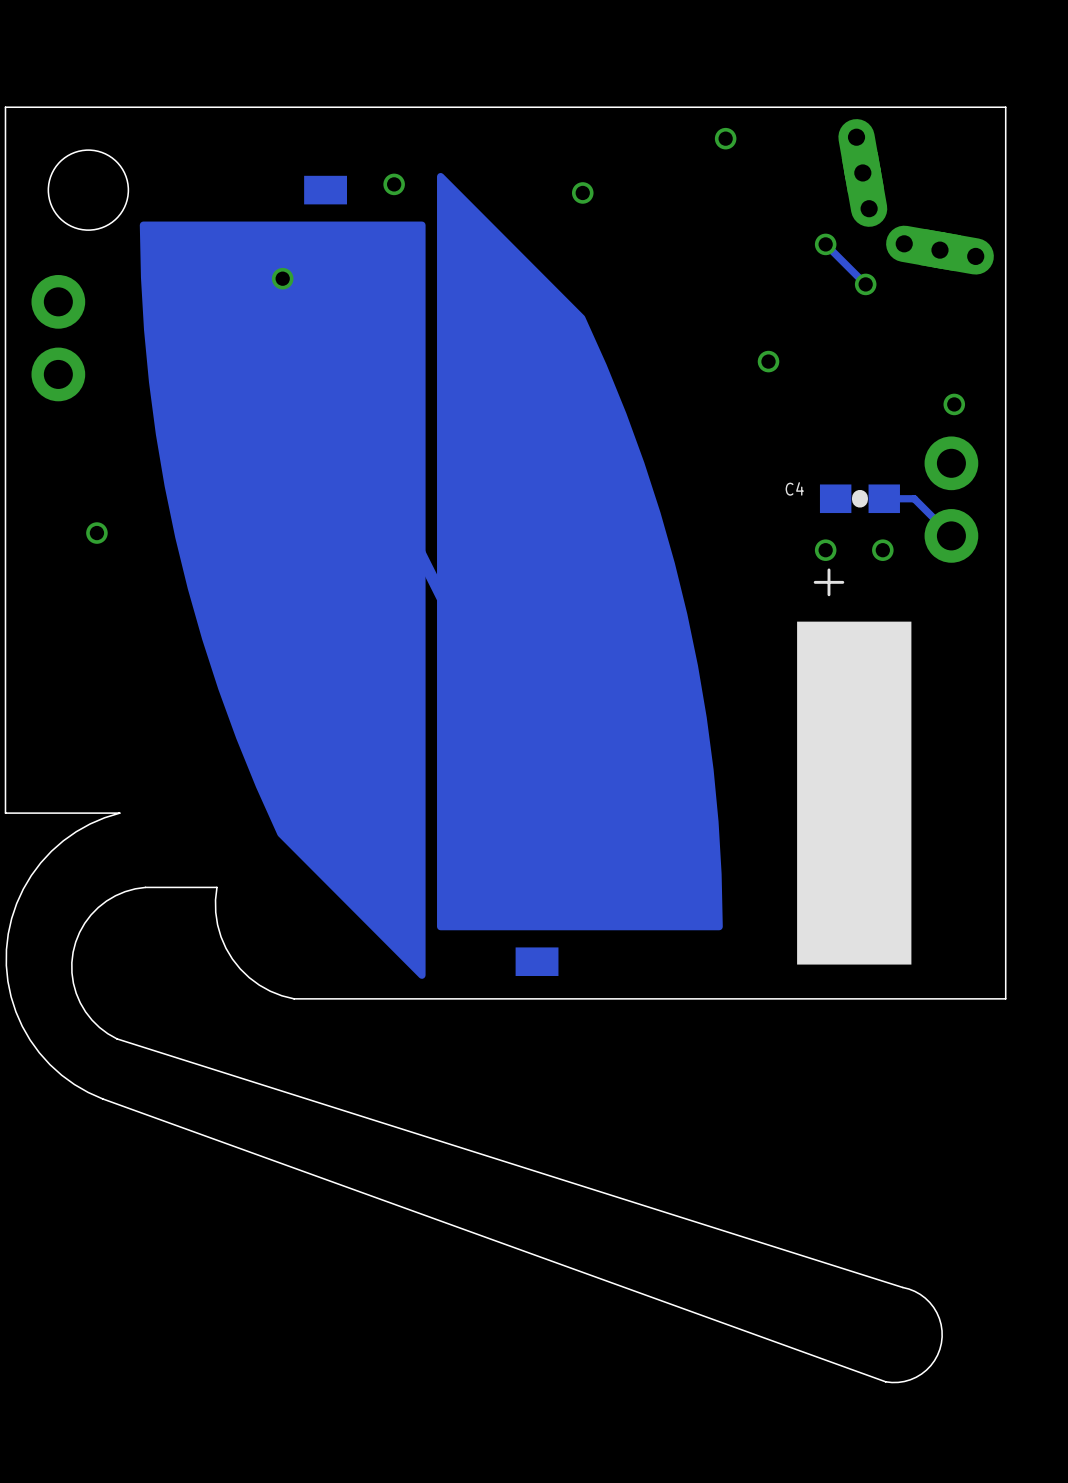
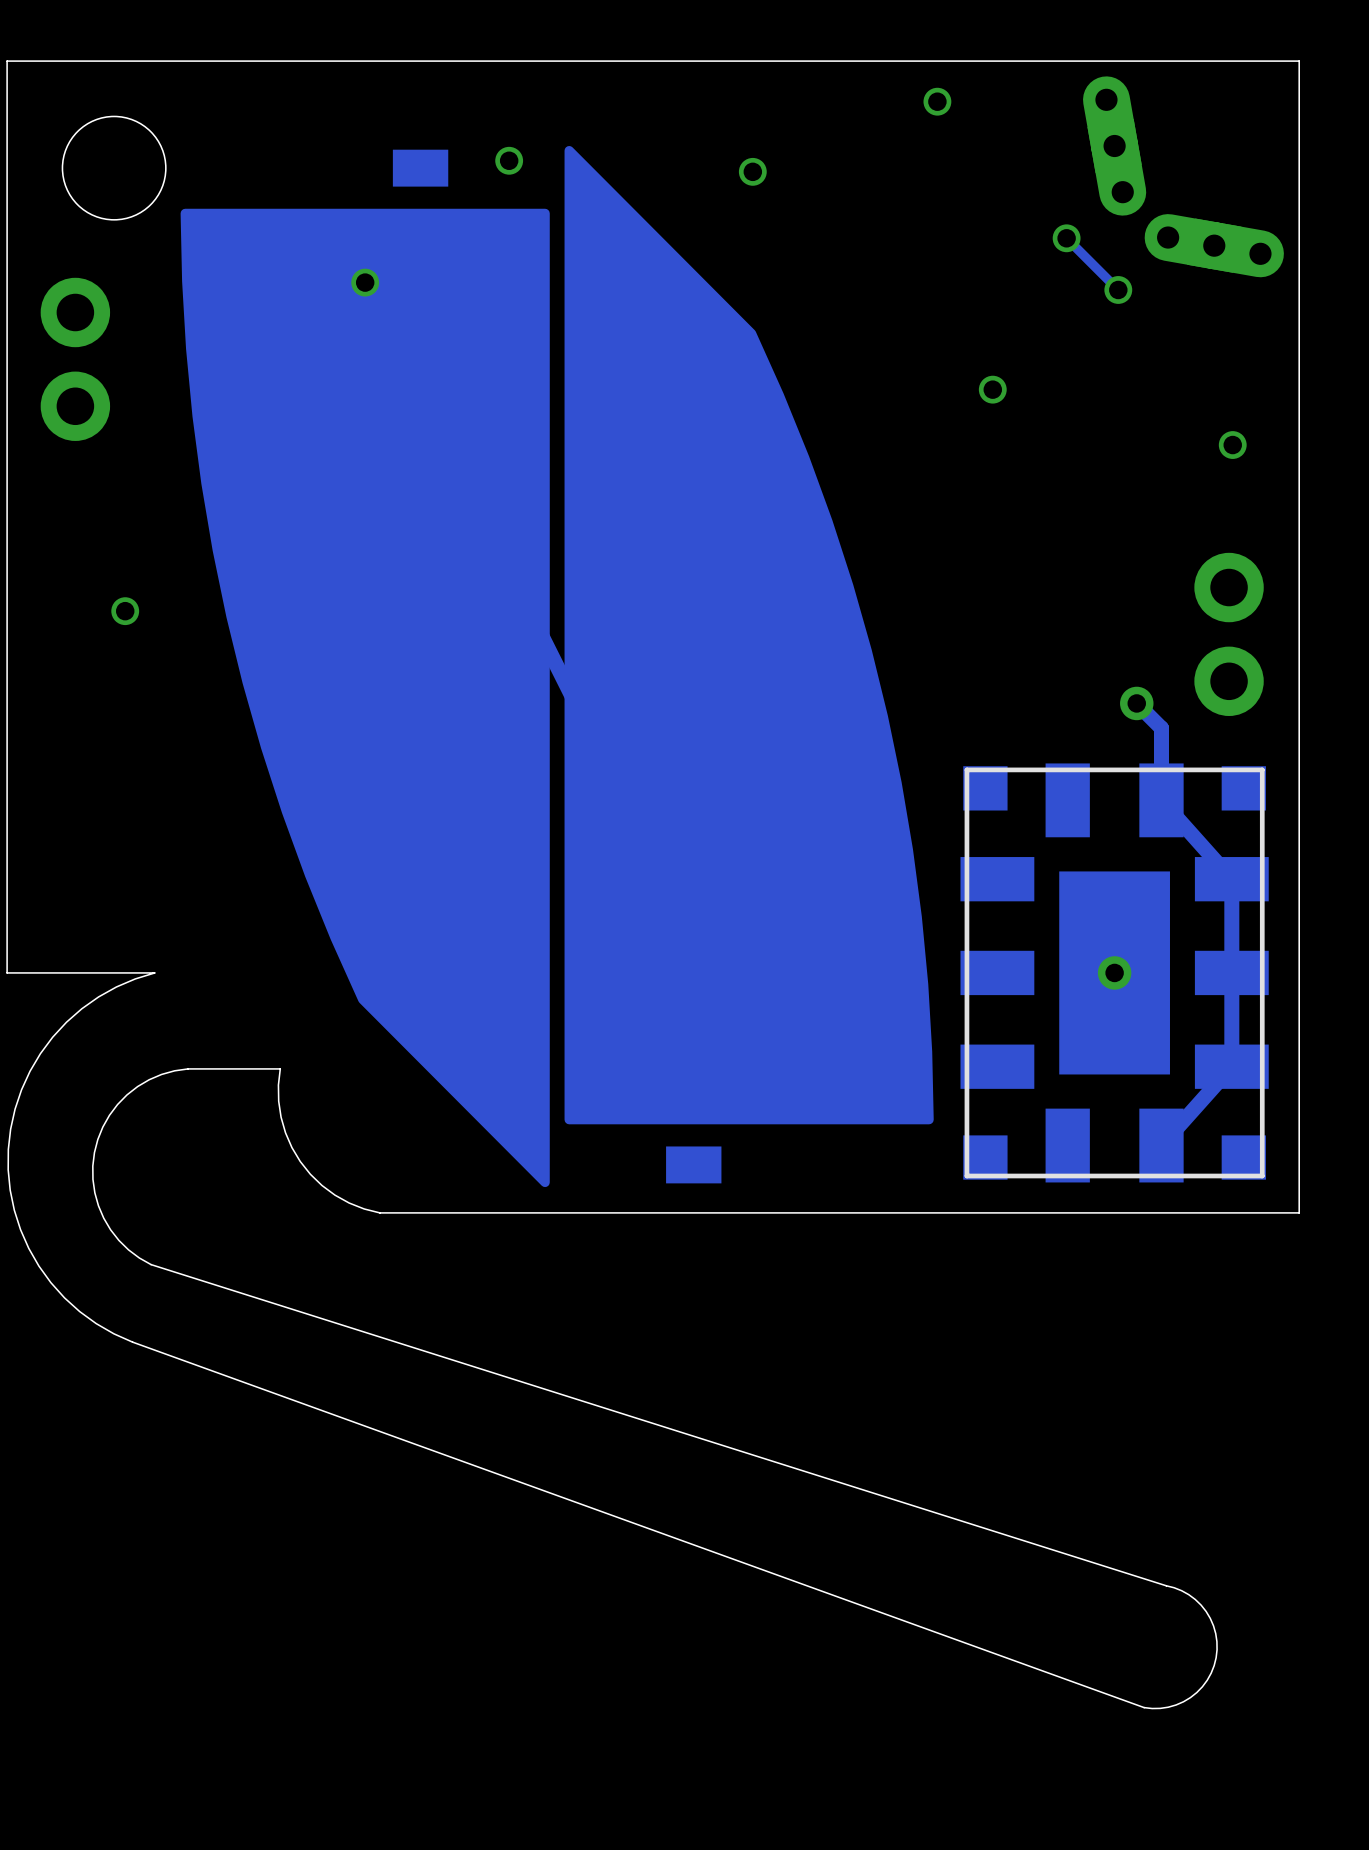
C4: (859, 498) -> none
track: (884, 498) (914, 498) (951, 535) -> none
part position: (951, 499) -> (1229, 634)
track: none -> (1136, 703) (1161, 728) (1161, 800) (1231, 879) (1231, 1066) (1161, 1145)
via: none -> (1136, 703)
part: (854, 751) -> none
part: none -> (1114, 972)
via: none -> (1114, 972)

